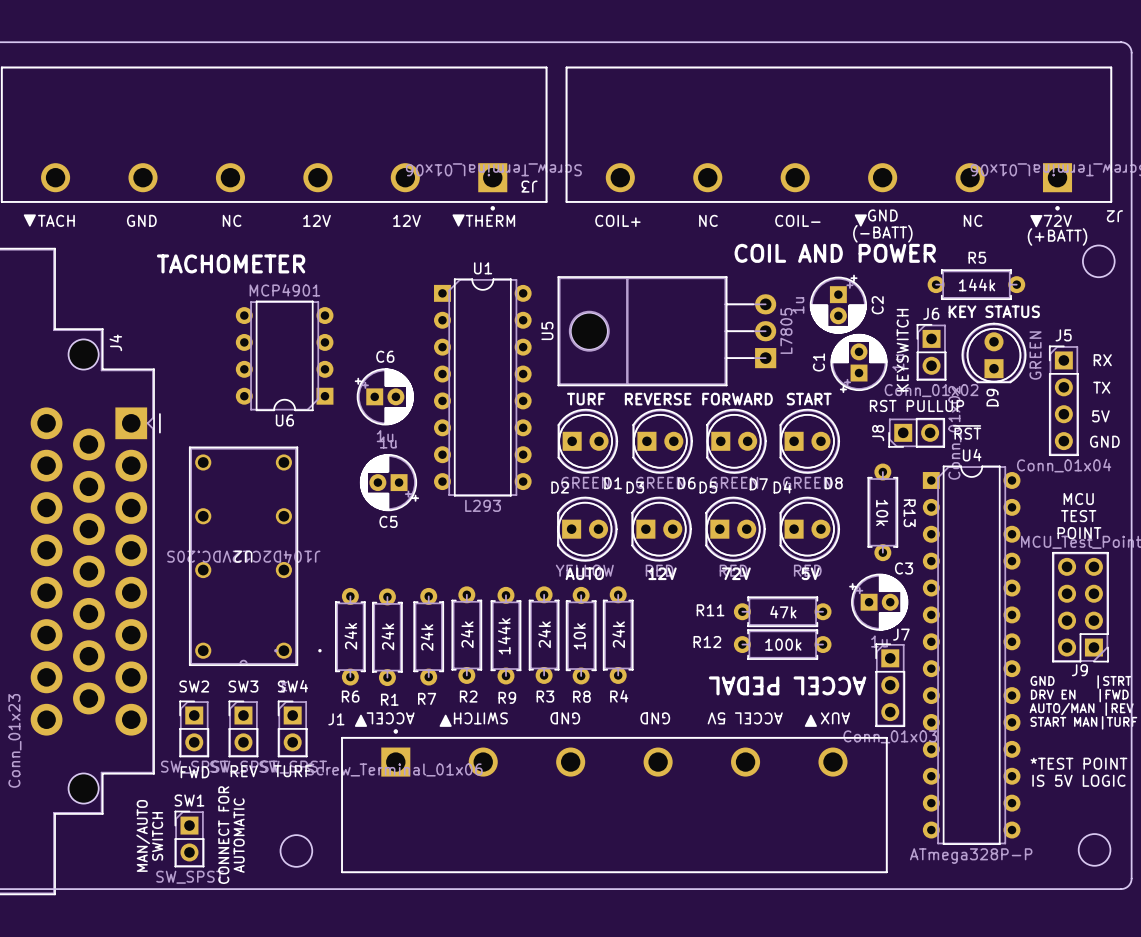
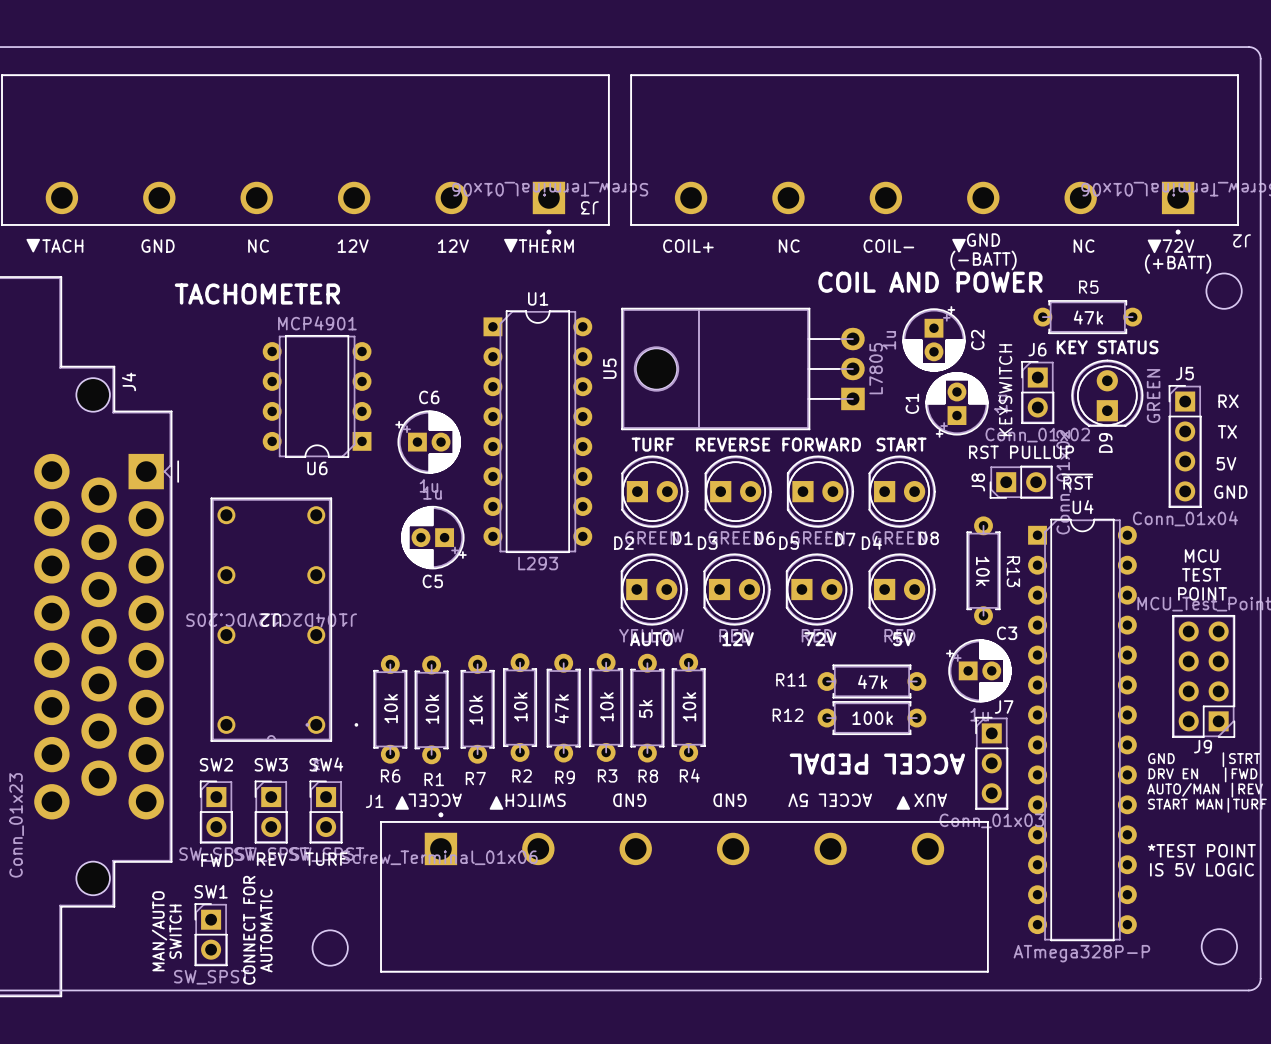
R5 value: 144k (977, 285) -> 47k (1088, 317)
R2 value: 24k (467, 634) -> 10k (520, 706)
R3 value: 24k (544, 634) -> 10k (606, 706)
R4 value: 24k (618, 634) -> 10k (689, 706)
R6 value: 24k (350, 636) -> 10k (391, 708)
R1 value: 24k (387, 636) -> 10k (432, 709)
R9 value: 144k (504, 636) -> 47k (561, 708)
R8 value: 10k (579, 636) -> 5k (645, 708)
R7 value: 24k (427, 637) -> 10k (475, 710)

